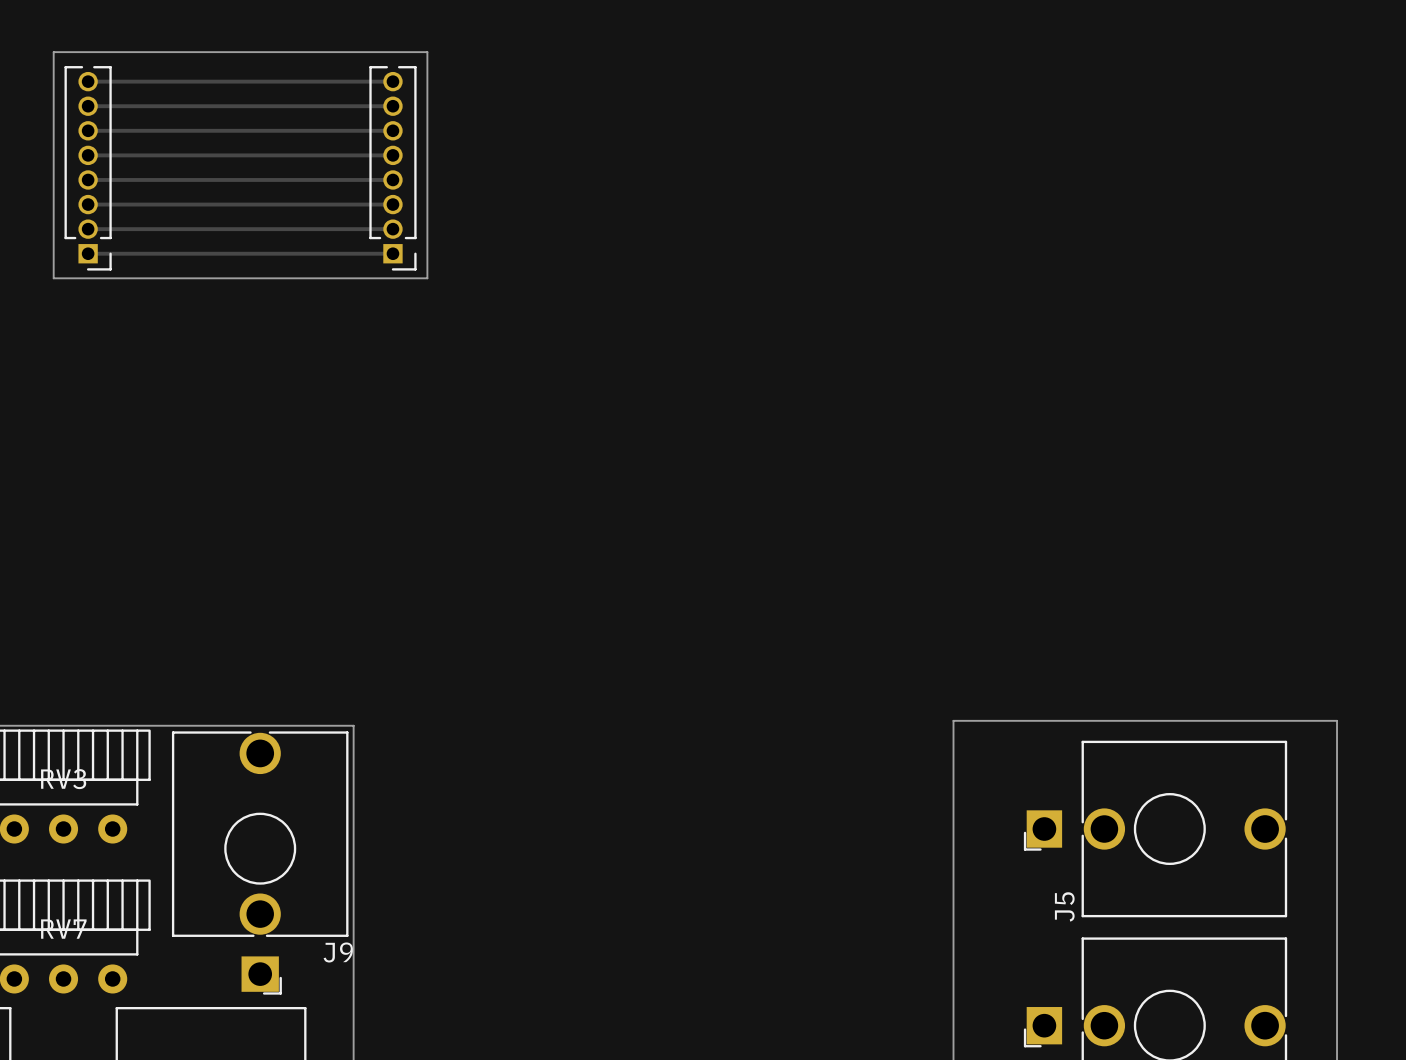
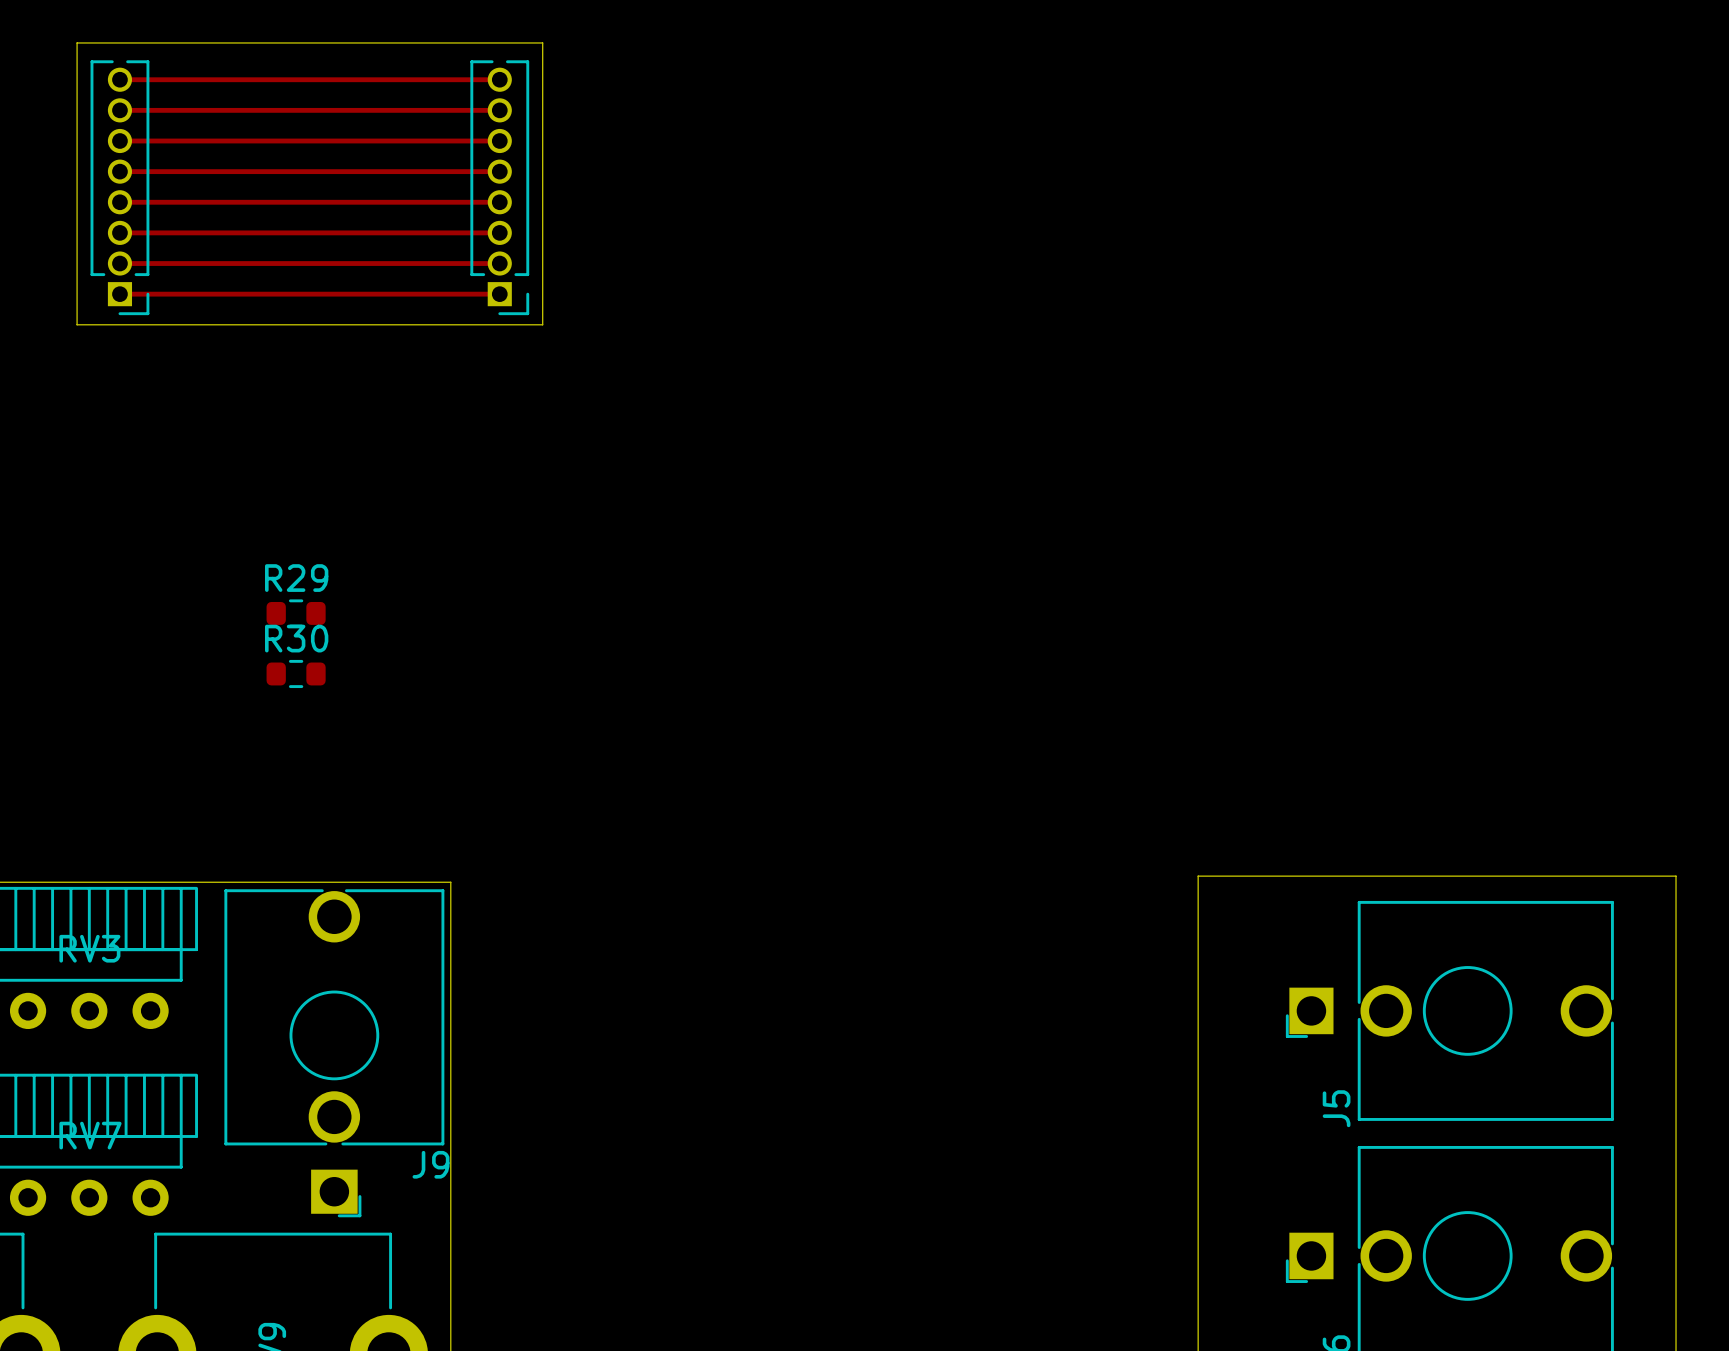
R29: none -> (296, 613)
R30: none -> (296, 673)

